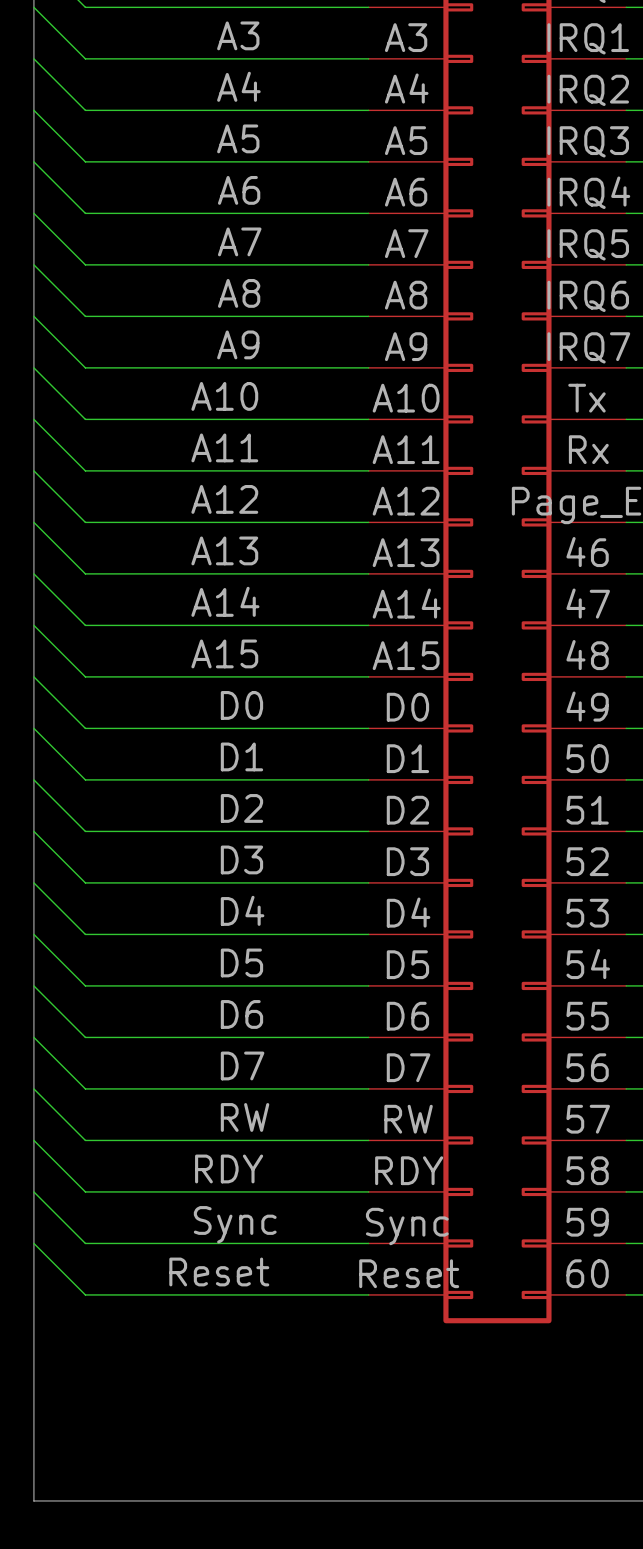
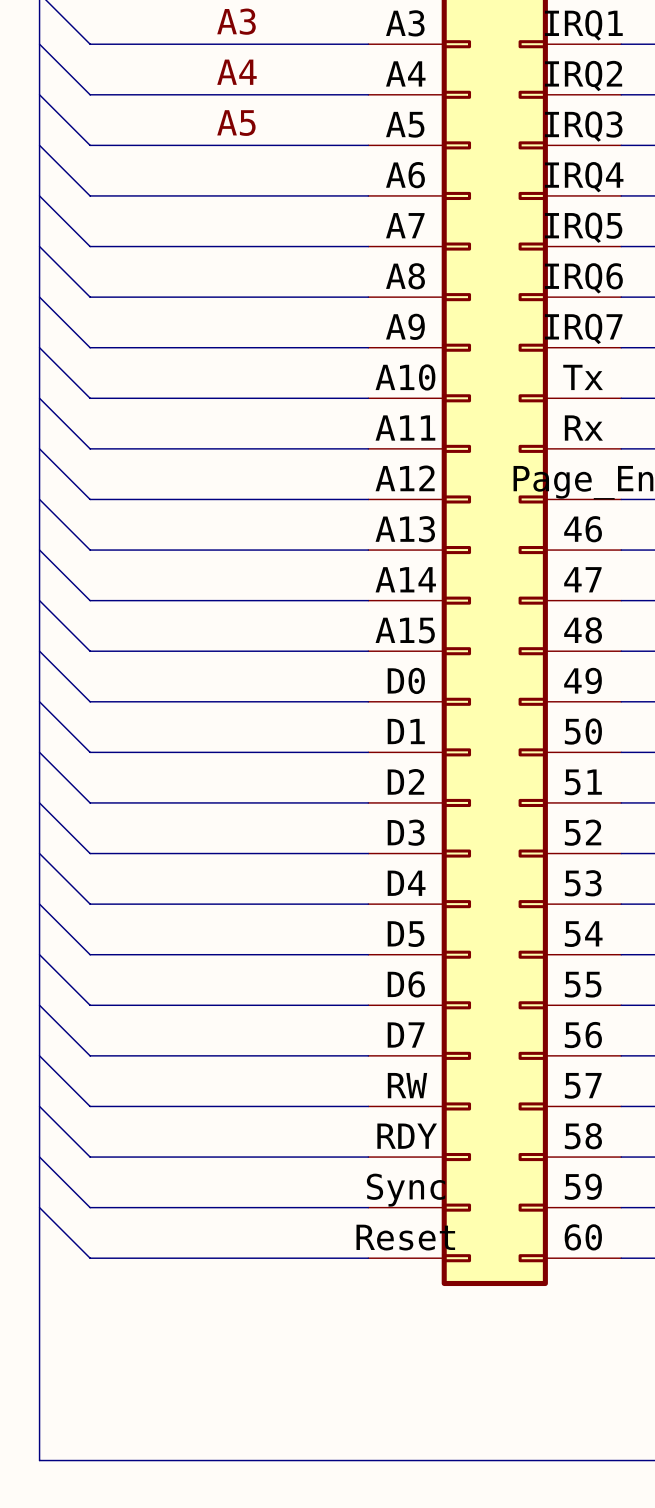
label: A6 (239, 190) -> none
label: A7 (239, 241) -> none
label: A8 (239, 293) -> none
label: A9 (238, 344) -> none
label: A10 (224, 396) -> none
label: A11 (224, 447) -> none
label: A12 (224, 499) -> none
label: A13 (224, 550) -> none
label: A14 (225, 601) -> none
label: A15 (224, 653) -> none
label: D0 (241, 705) -> none
label: D1 (241, 756) -> none
label: D2 (241, 808) -> none
label: D3 (241, 859) -> none
label: D4 (242, 910) -> none
label: D5 (241, 962) -> none
label: D6 (241, 1014) -> none
label: D7 (242, 1065) -> none
label: RW (245, 1117) -> none
label: RDY (229, 1168) -> none
label: Sync (235, 1224) -> none
label: Reset (219, 1271) -> none

